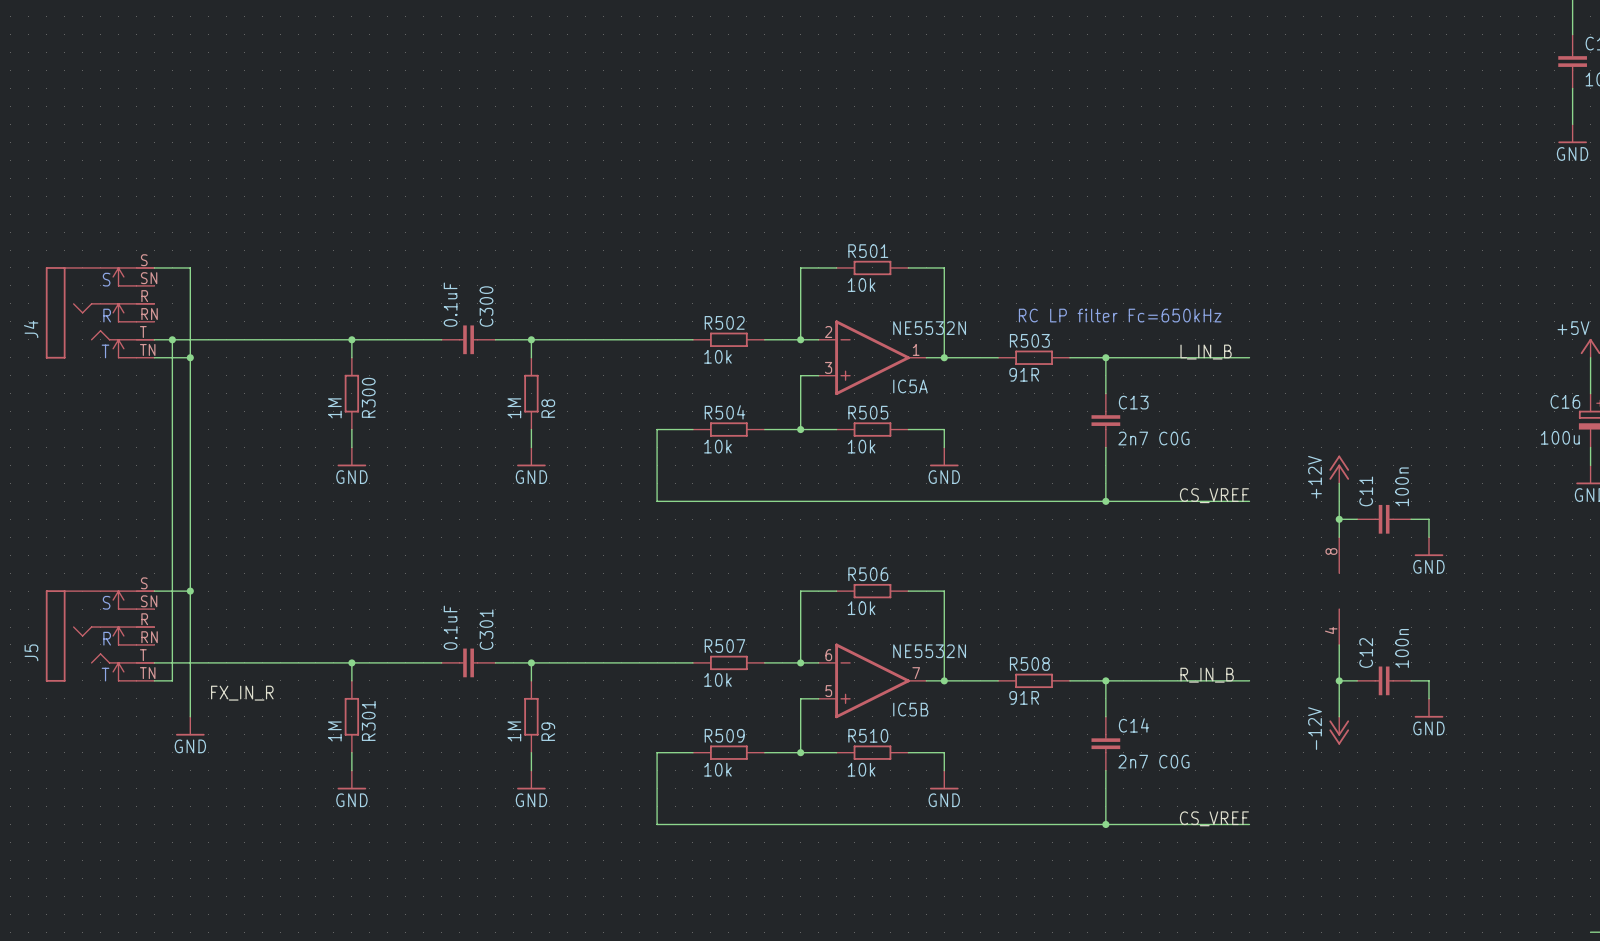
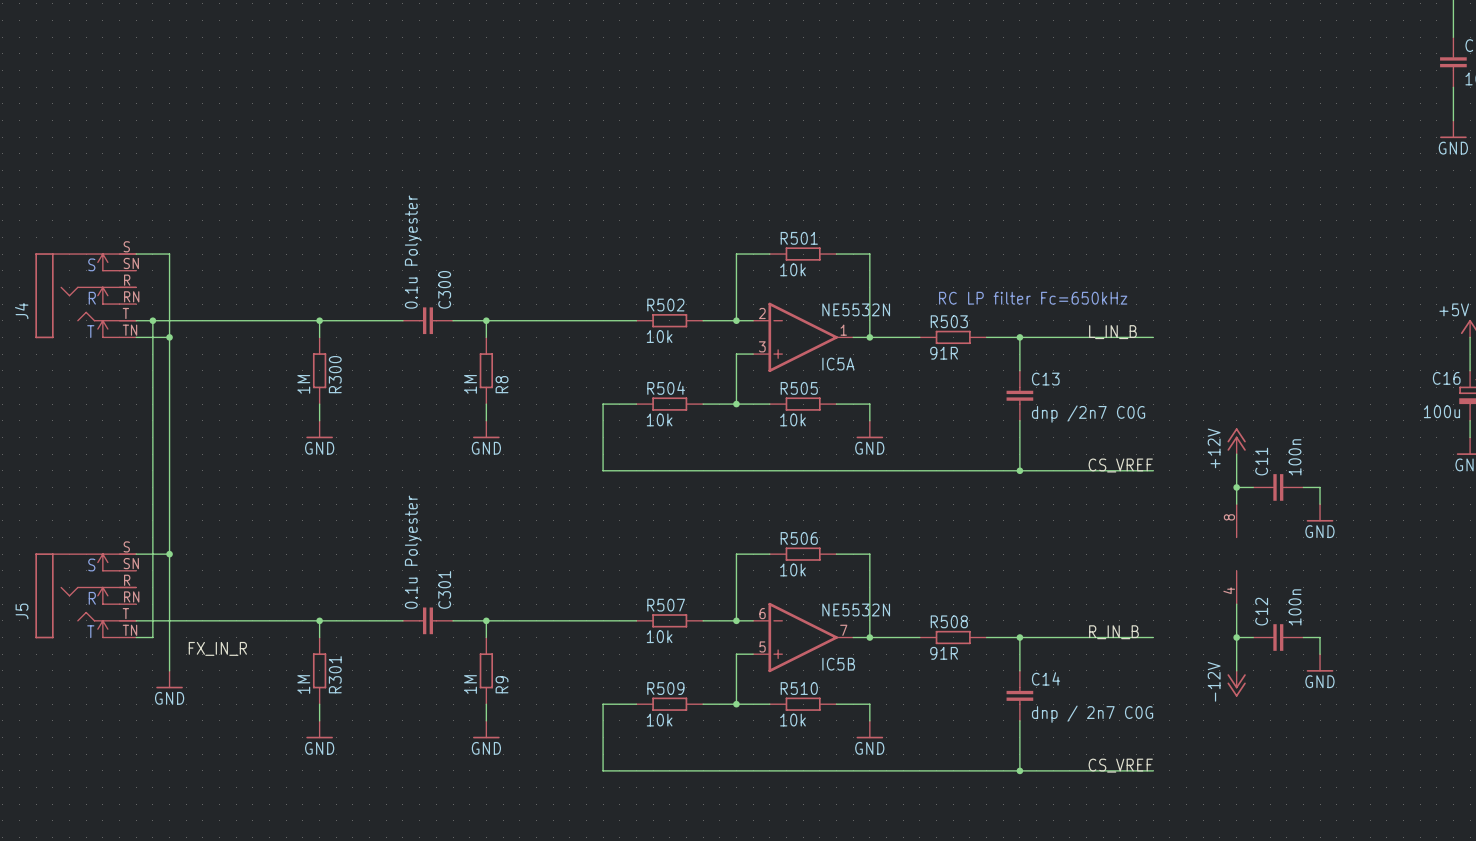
C300 value: 0.1uF (450, 304) -> 0.1u Polyester (413, 252)
C13 value: 2n7 C0G (1153, 438) -> dnp /2n7 C0G (1088, 414)
C301 value: 0.1uF (450, 627) -> 0.1u Polyester (413, 552)
C14 value: 2n7 C0G (1153, 761) -> dnp / 2n7 C0G (1092, 714)

